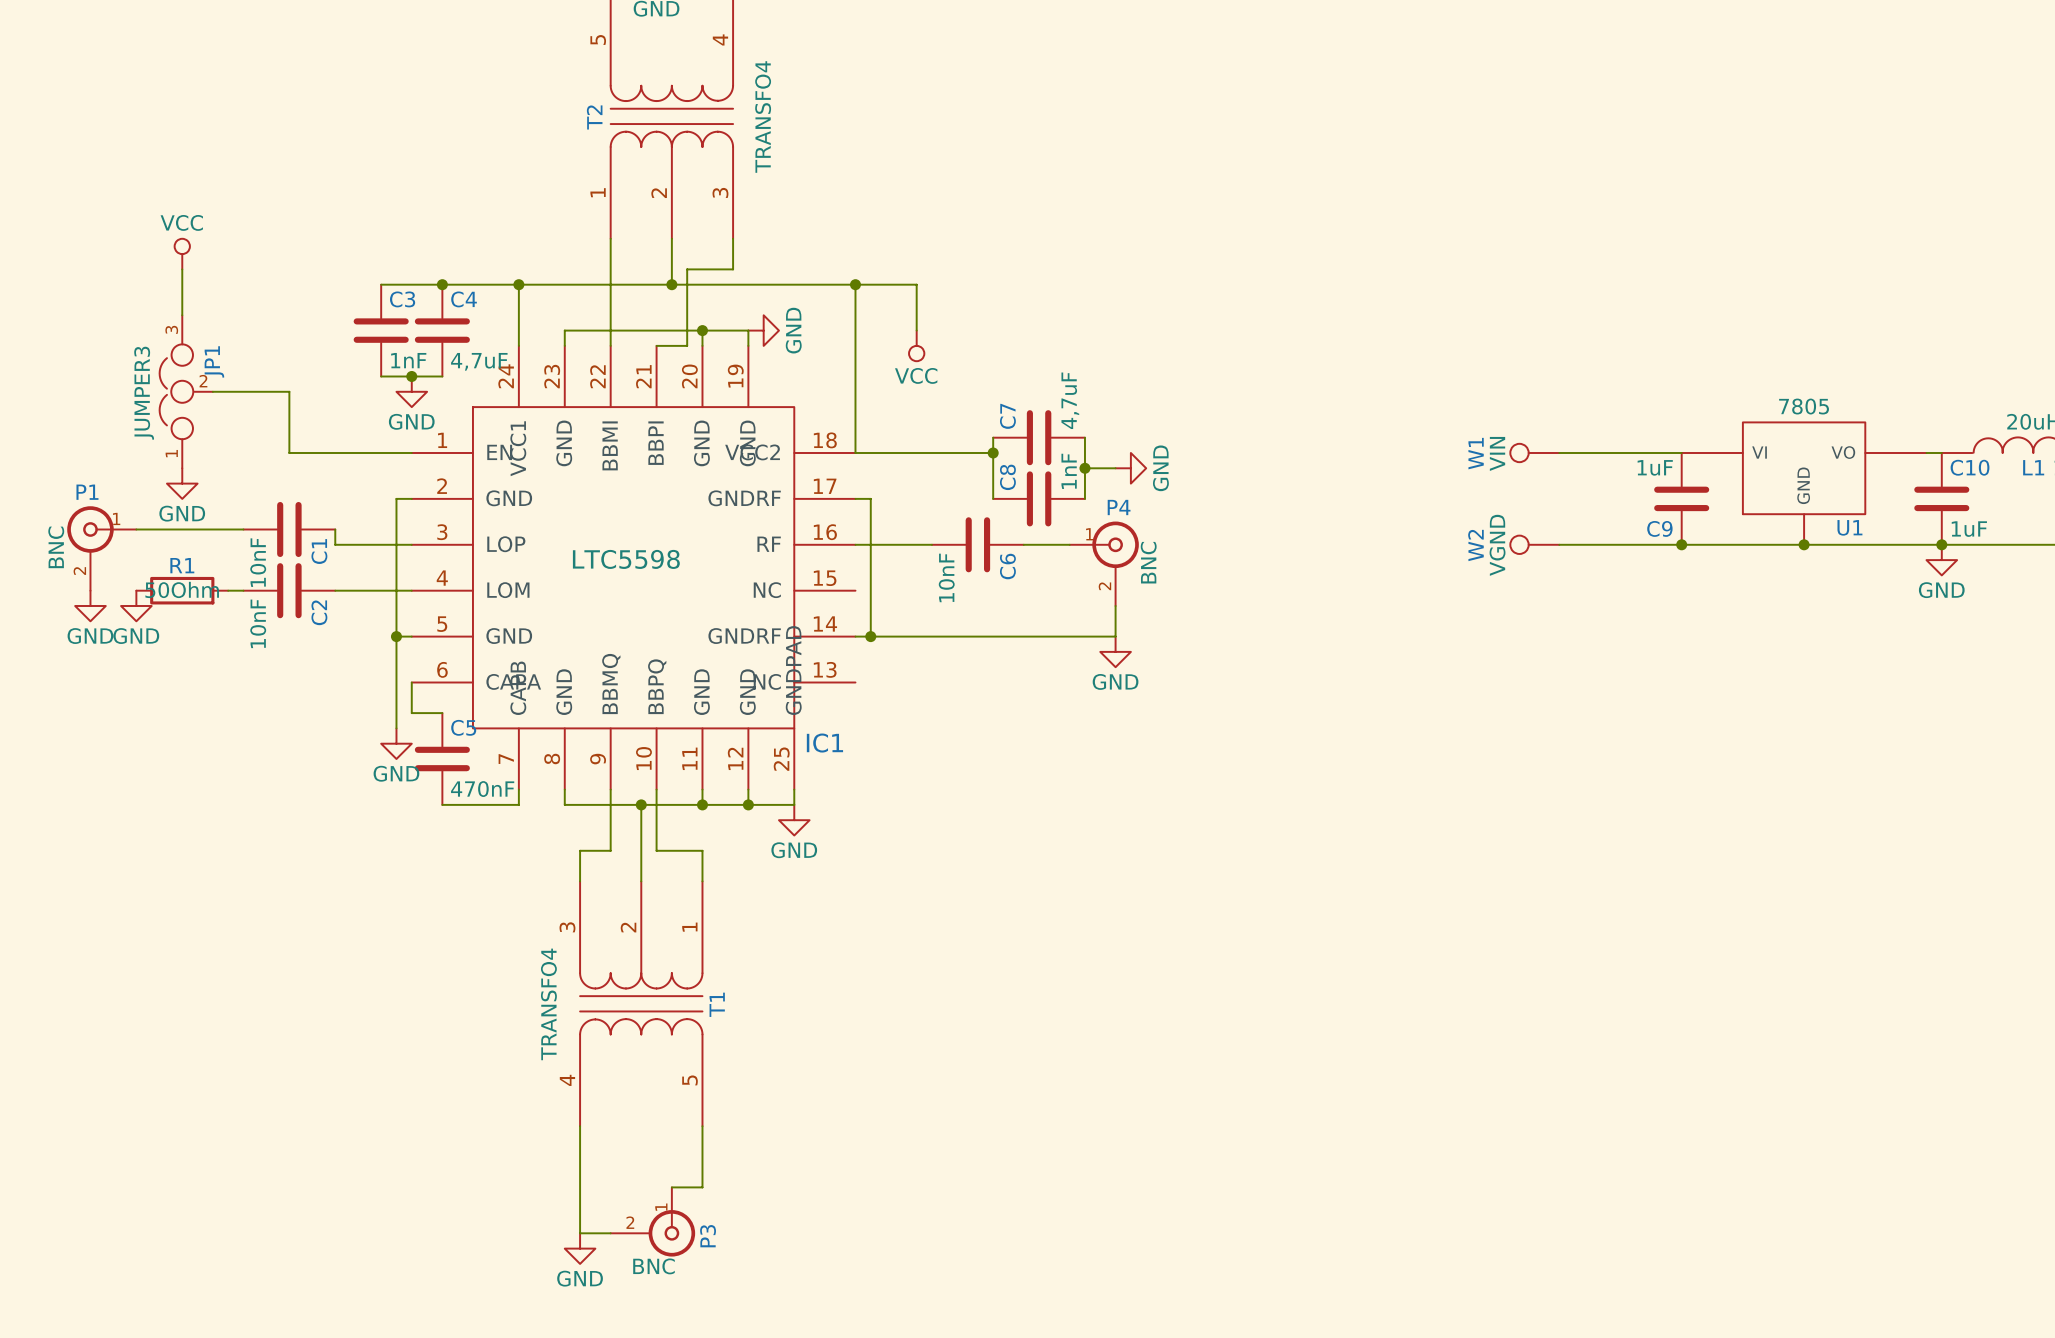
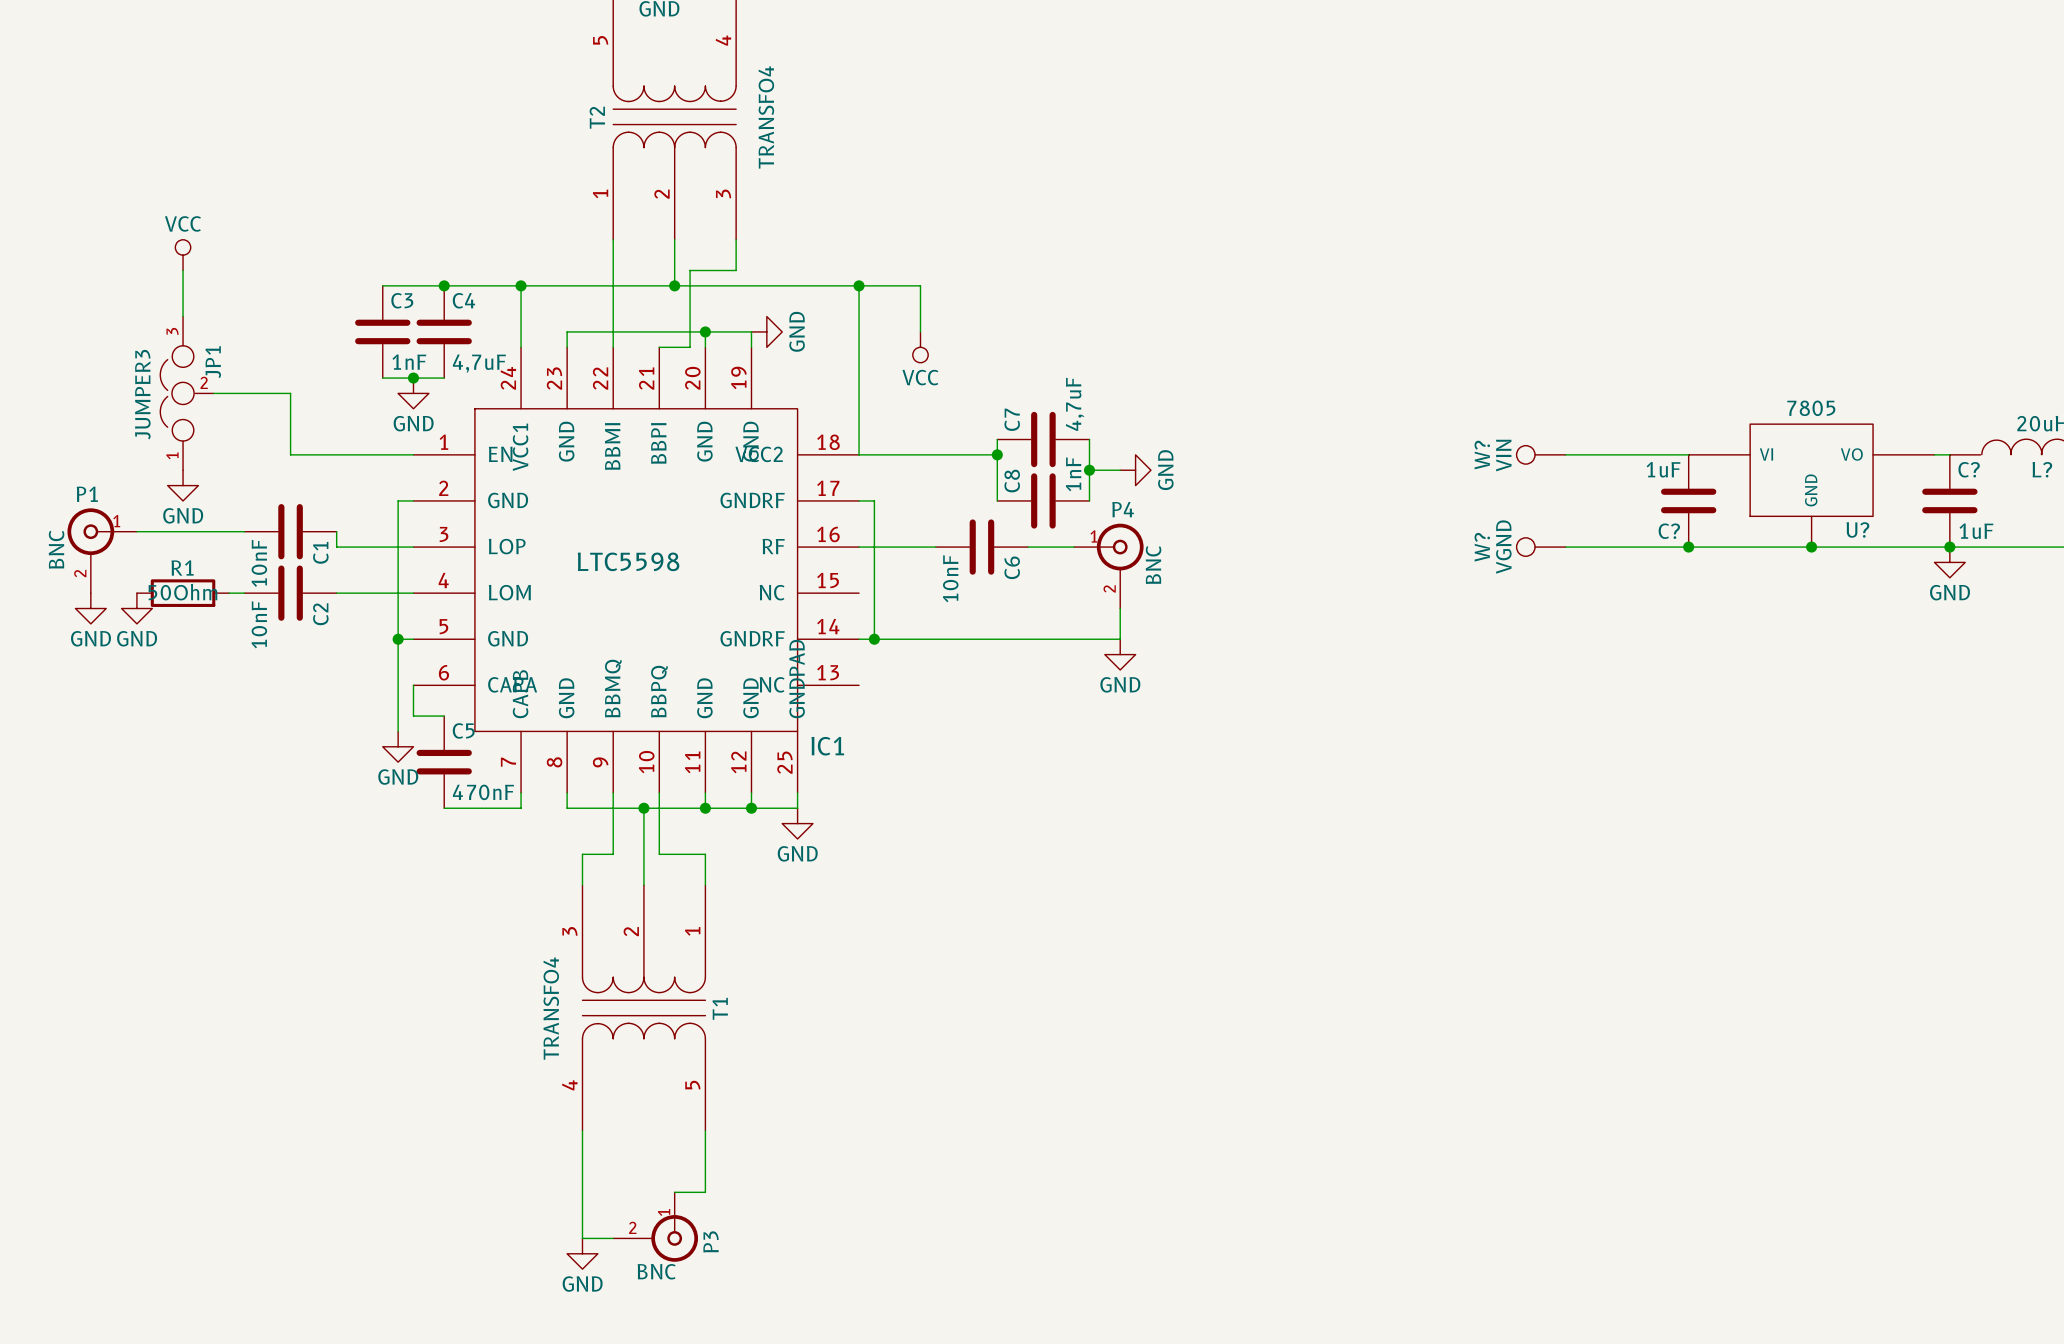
W1 name: W1 (1476, 453) -> W? (1482, 455)
C10 name: C10 (1970, 467) -> C? (1969, 469)
L1 name: L1 (2033, 467) -> L? (2042, 469)
U1 name: U1 (1849, 527) -> U? (1857, 529)
C9 name: C9 (1659, 528) -> C? (1669, 531)
W2 name: W2 (1475, 545) -> W? (1482, 547)

